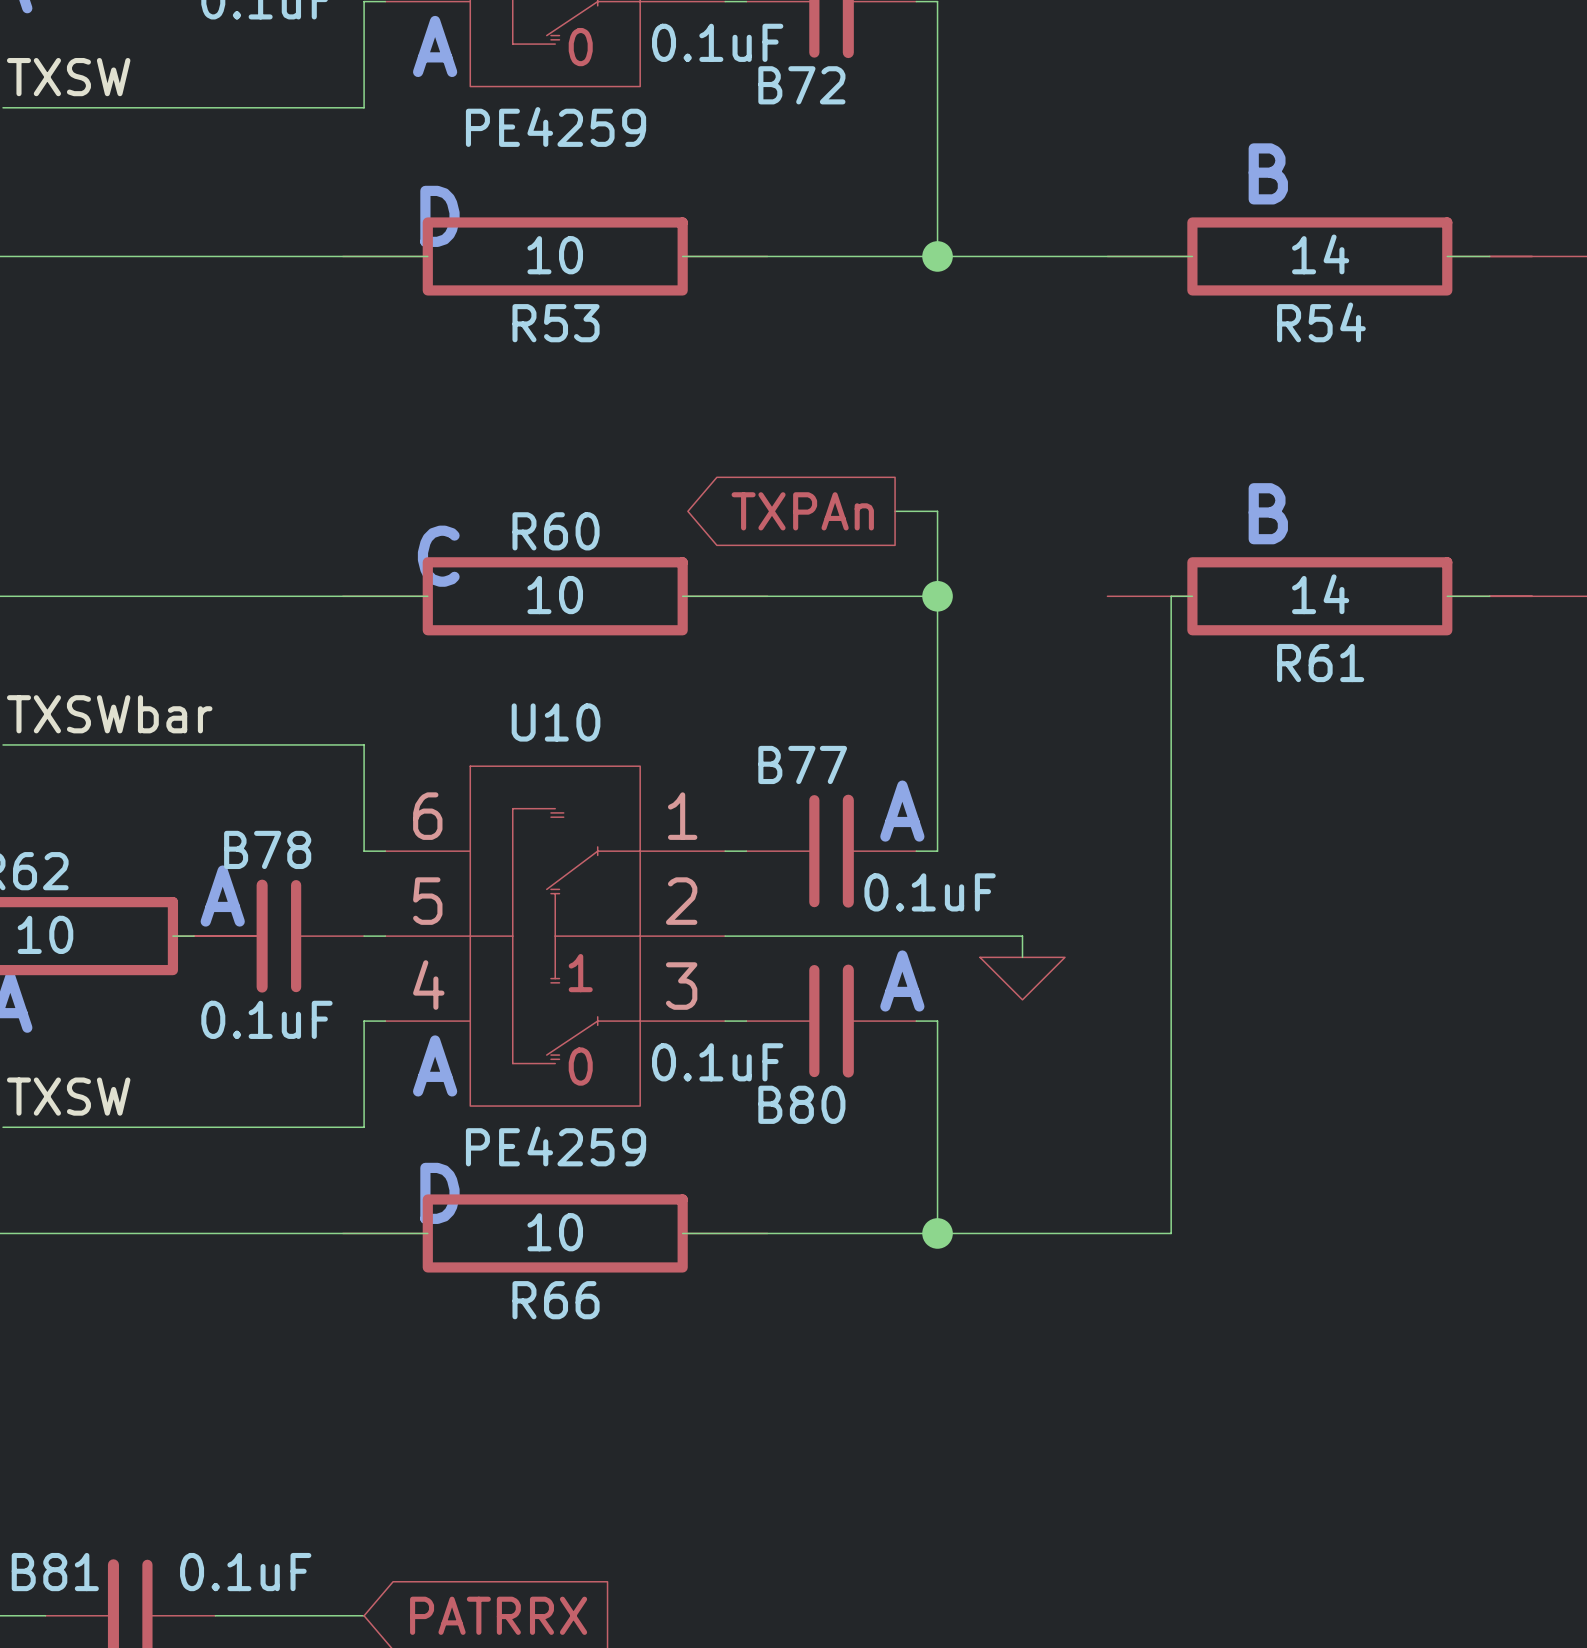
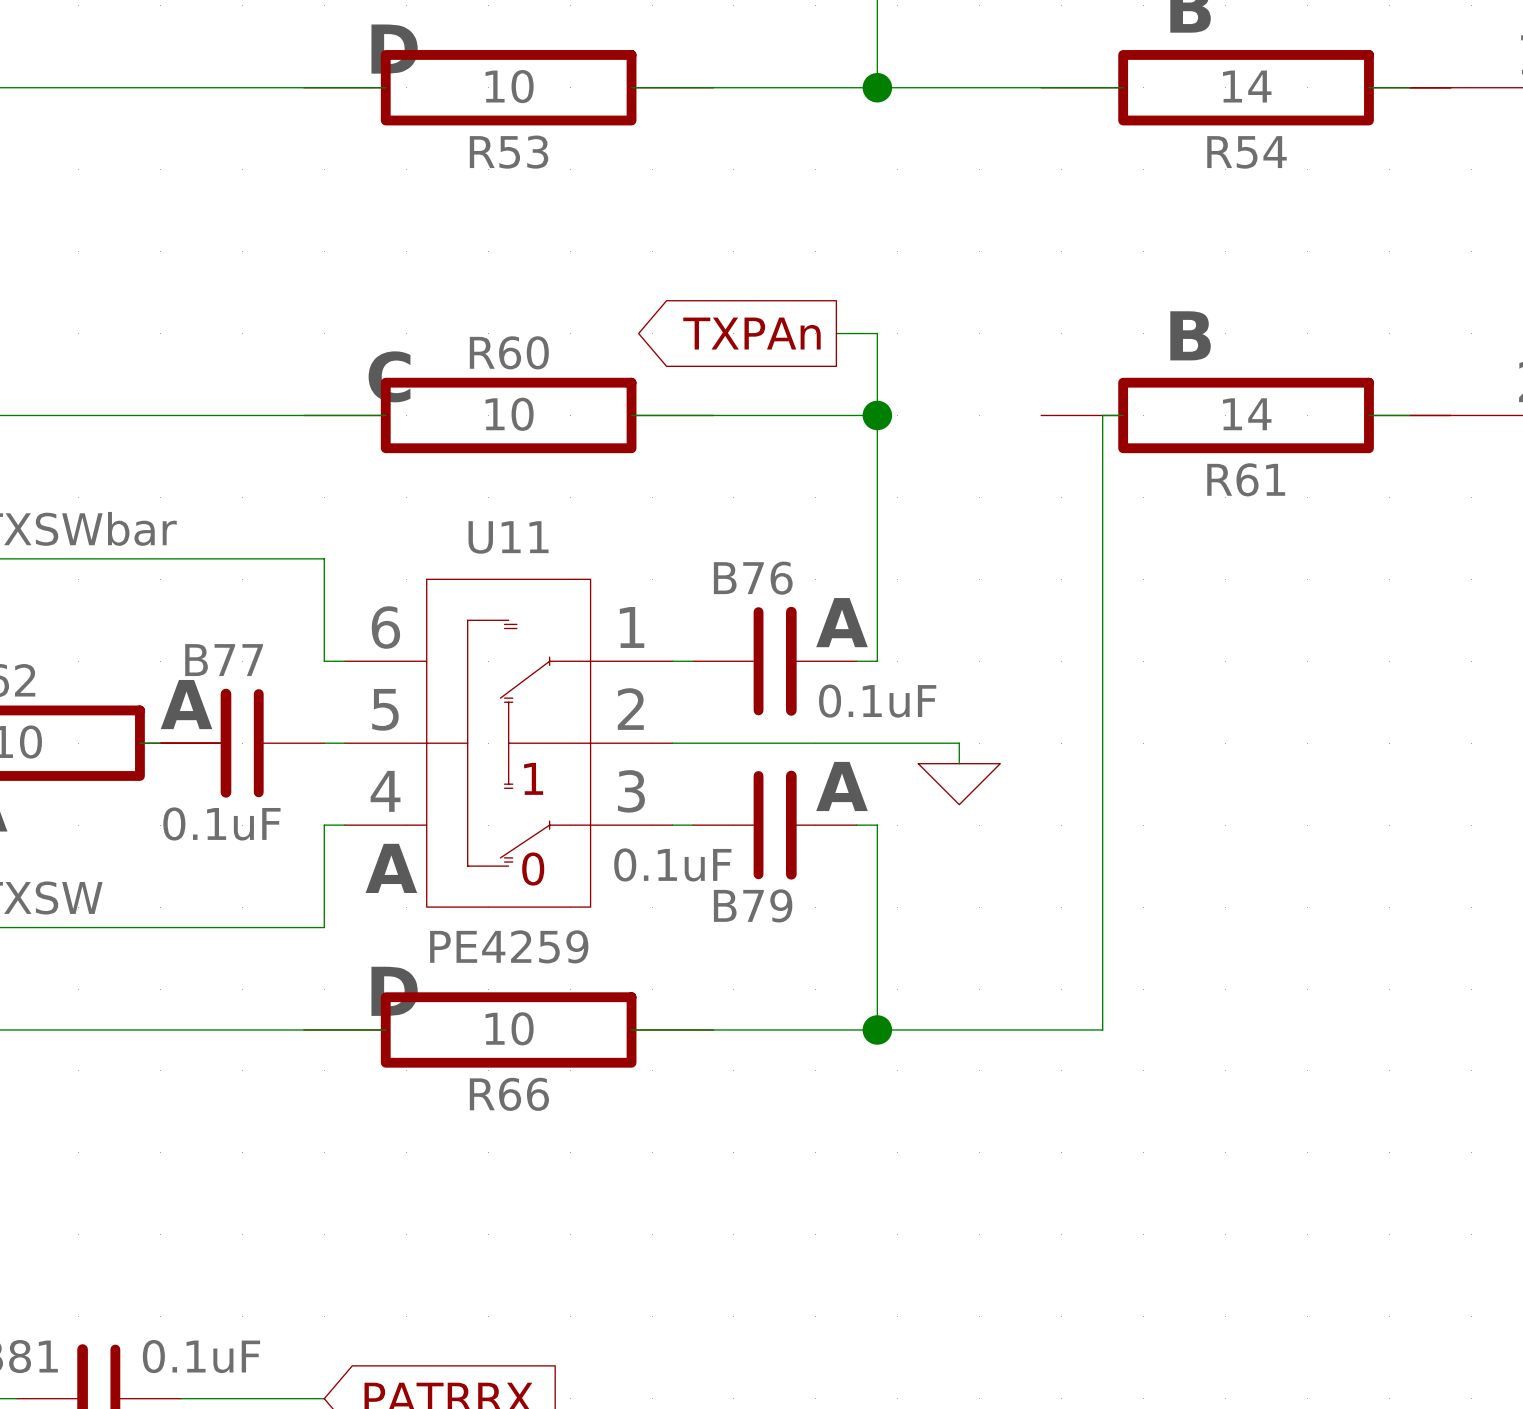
U10 name: U10 (556, 722) -> U11 (508, 537)
B77 name: B77 (802, 764) -> B76 (753, 578)
B78 name: B78 (267, 849) -> B77 (224, 660)
B80 name: B80 (801, 1104) -> B79 (753, 905)

